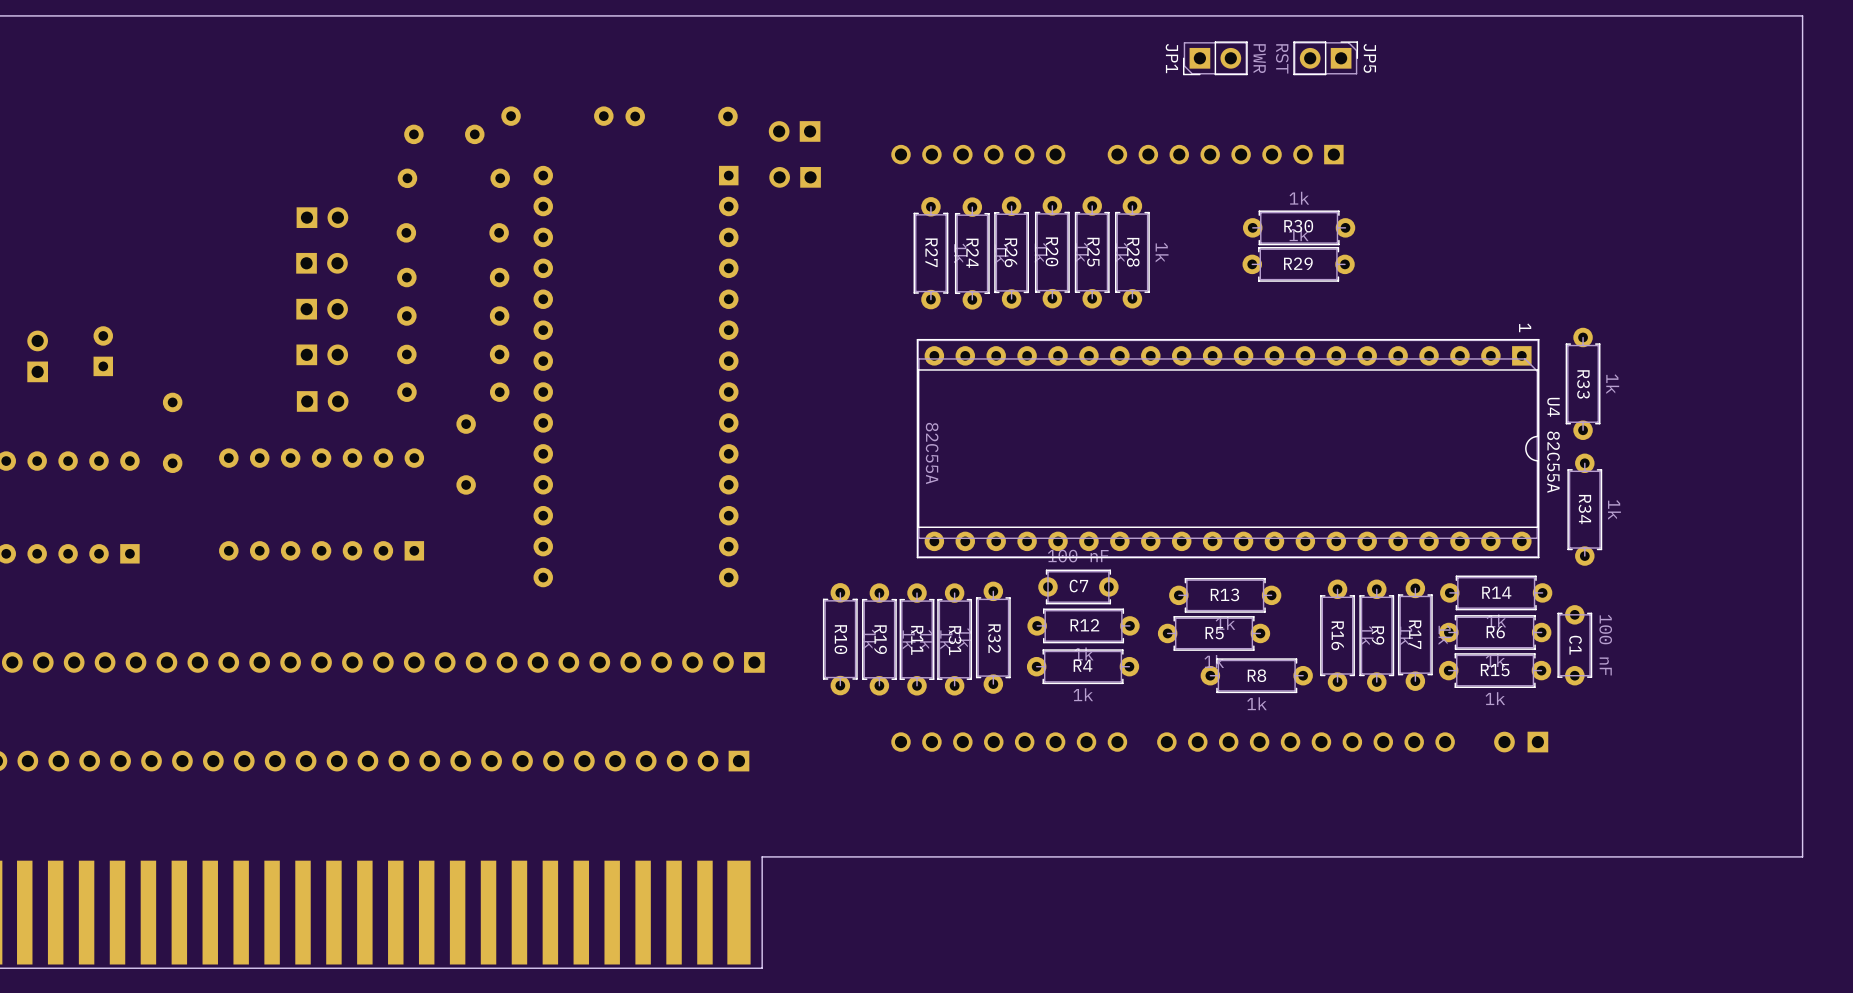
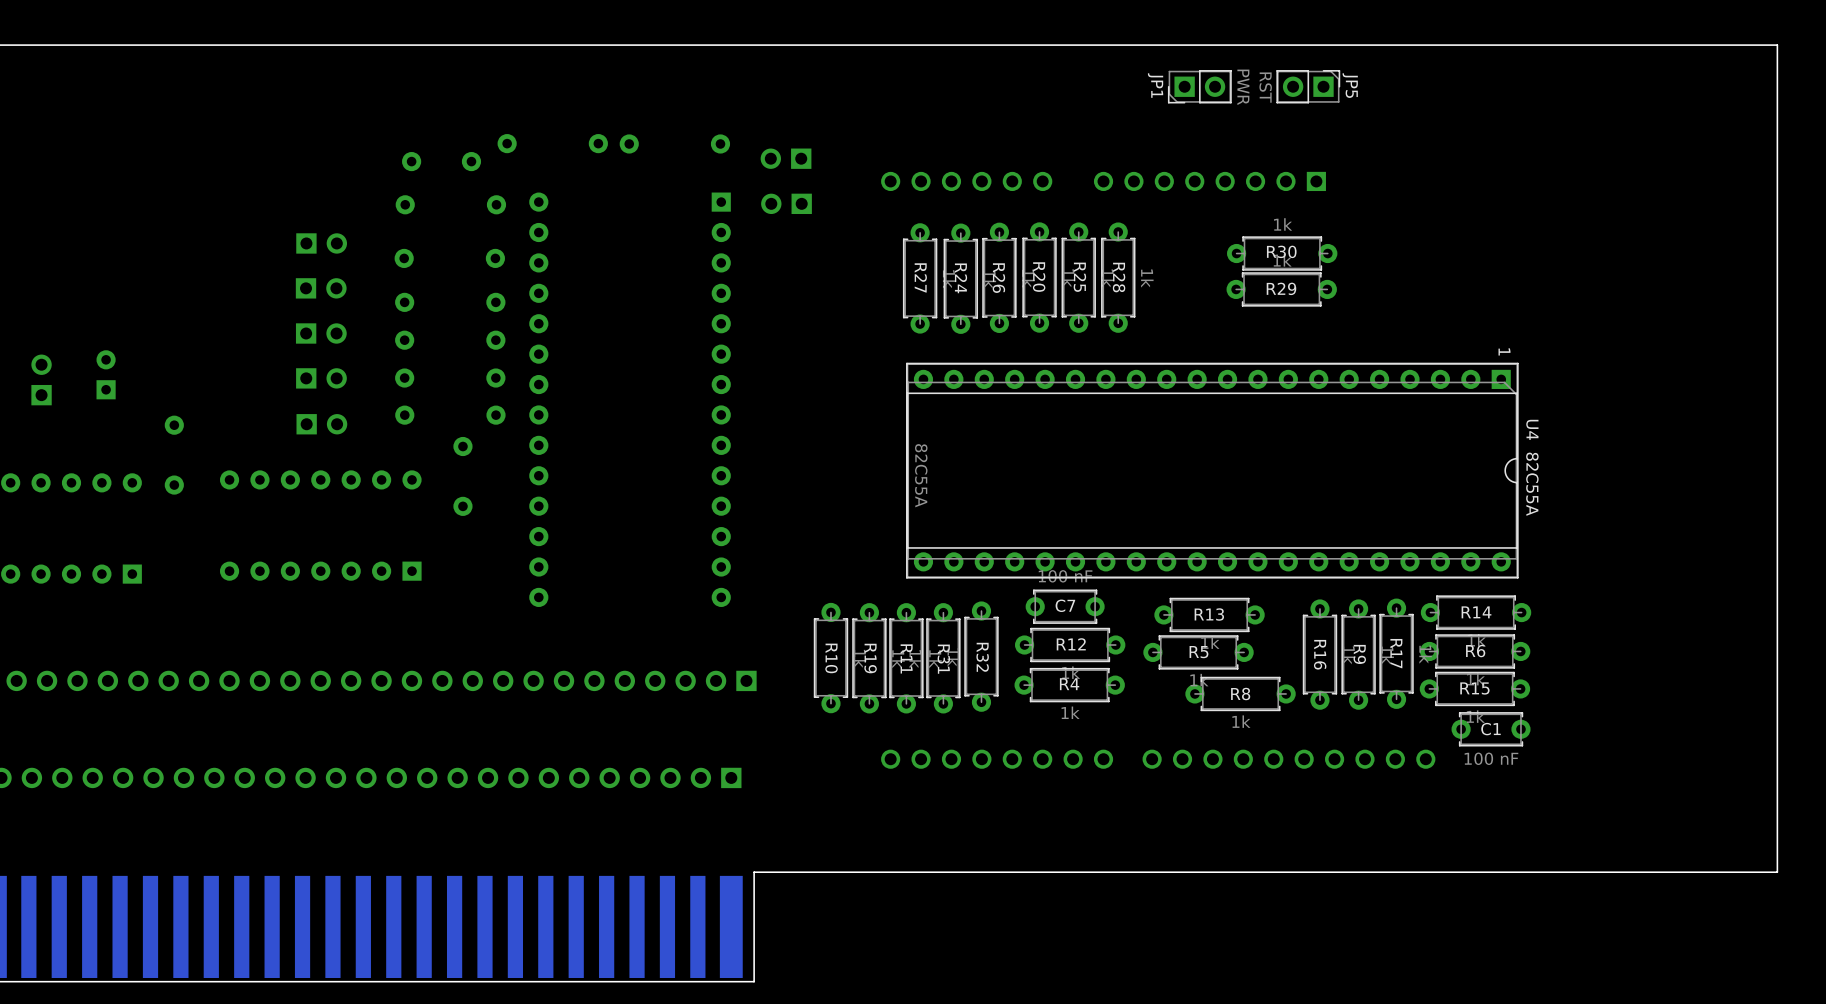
R33: 1k (1583, 383) -> none
R34: 1k (1584, 509) -> none
C1 rotation: 0° (1574, 645) -> 90° clockwise (1491, 729)
C1 position: (1574, 645) -> (1491, 729)
part: (1521, 742) -> none

